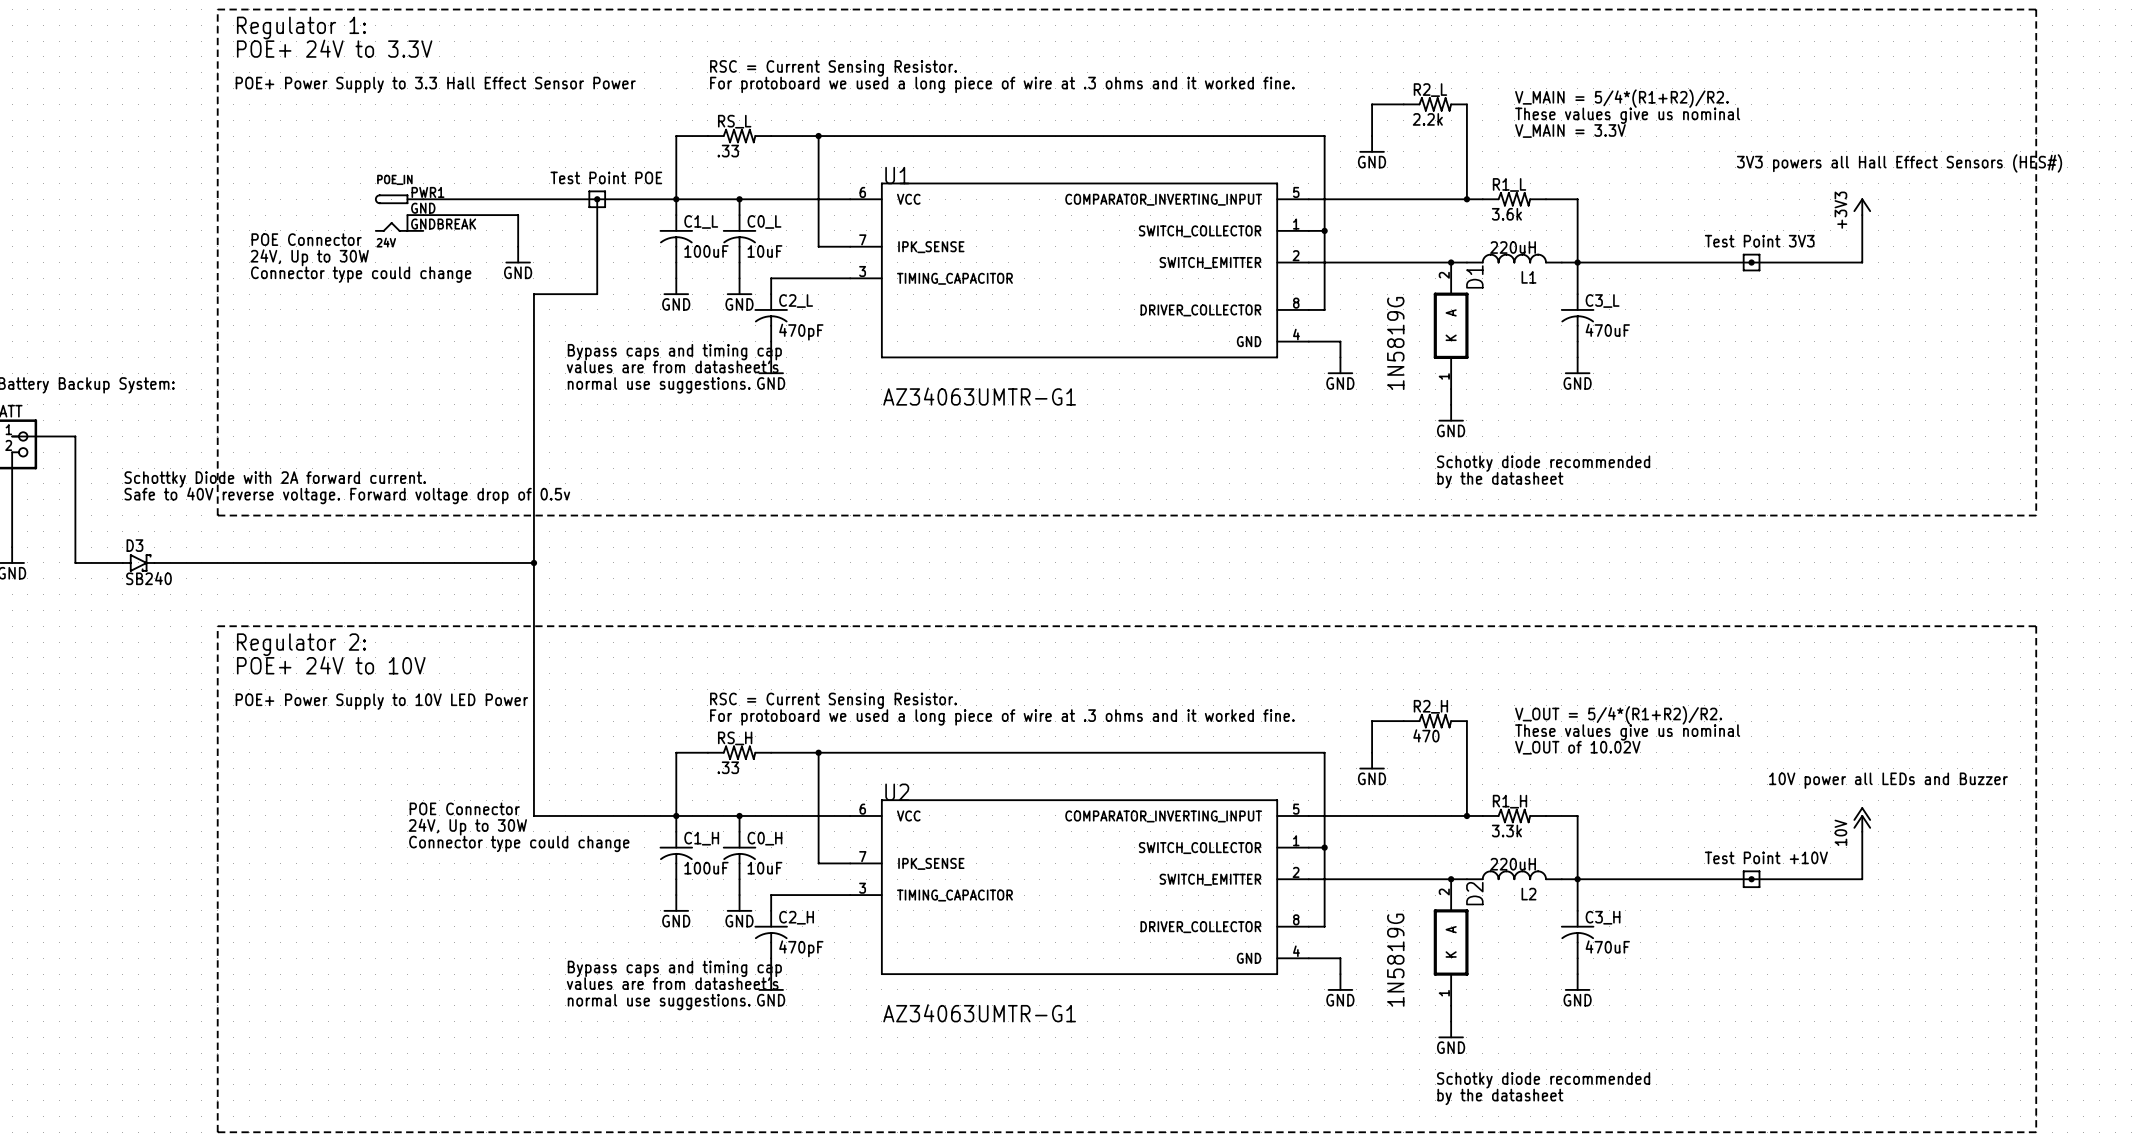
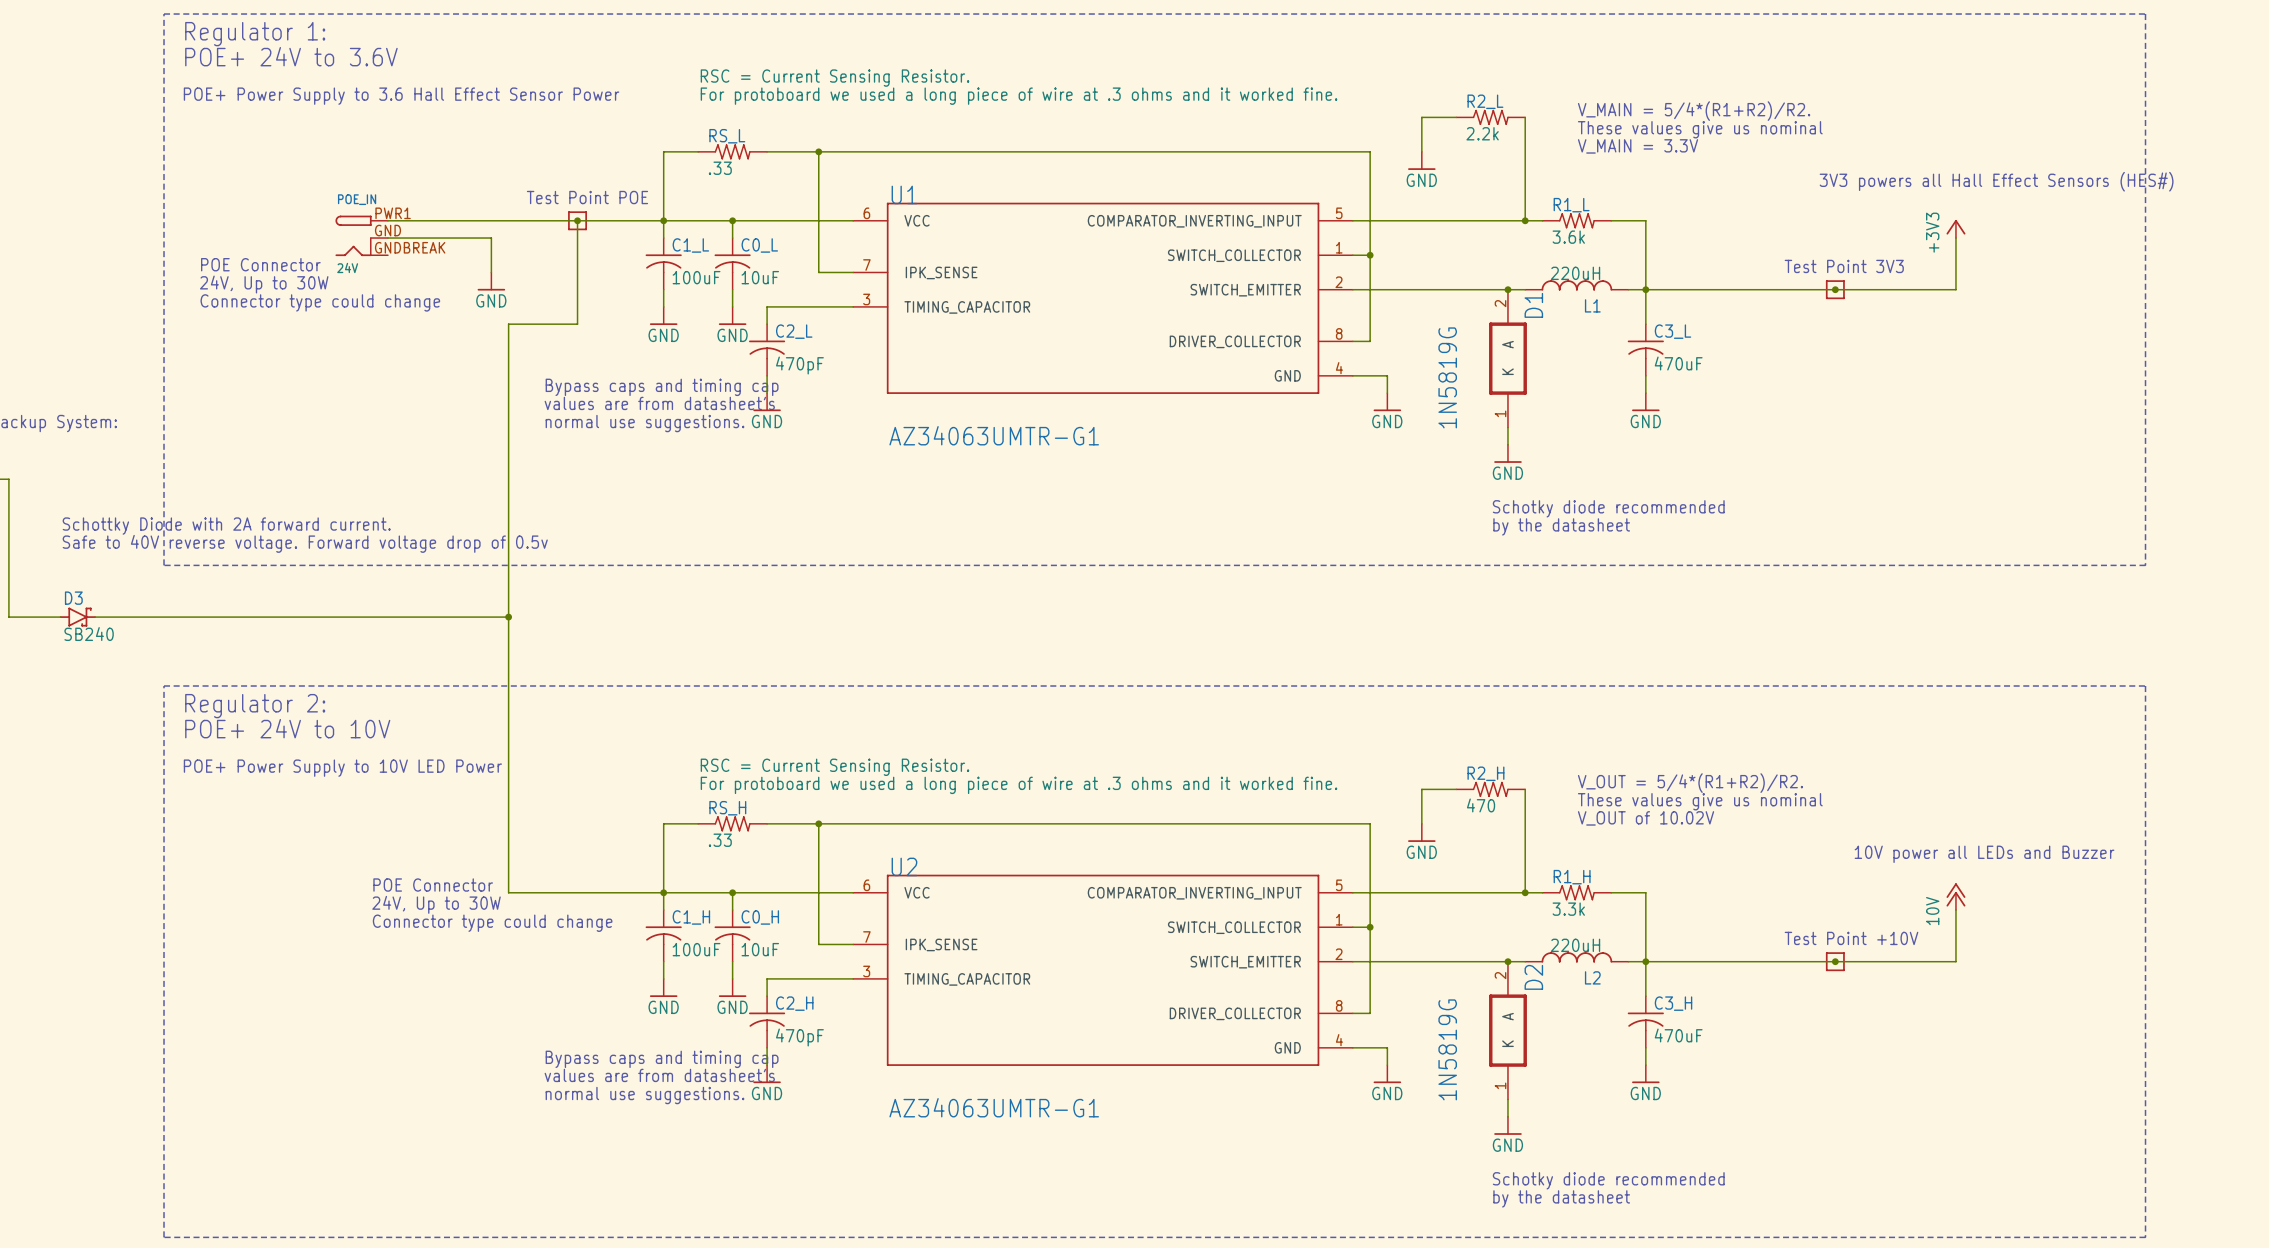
text: POE+ 24V to 3.3V (334, 48) -> POE+ 24V to 3.6V (291, 56)
text: POE+ Power Supply to 3.3 Hall Effect Sensor Power (435, 84) -> POE+ Power Supply to 3.6 Hall Effect Sensor Power (401, 96)

